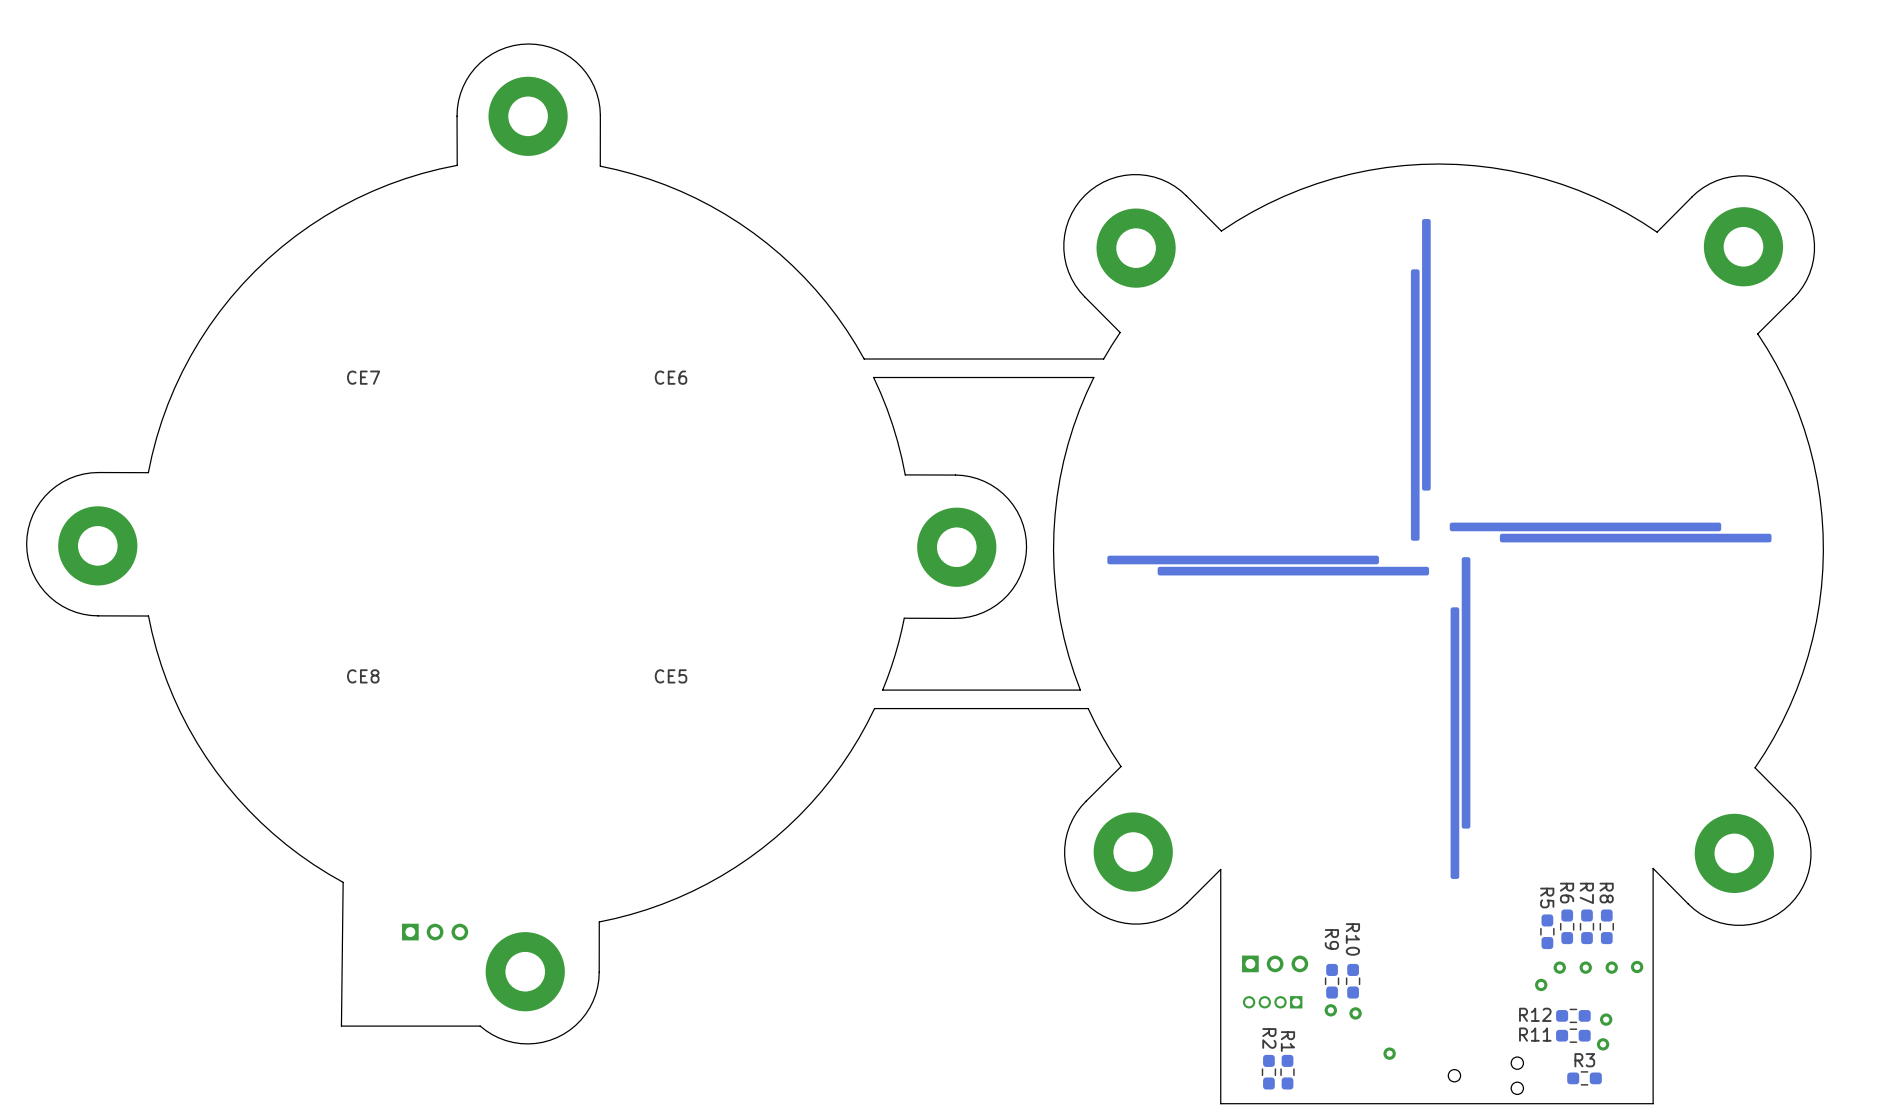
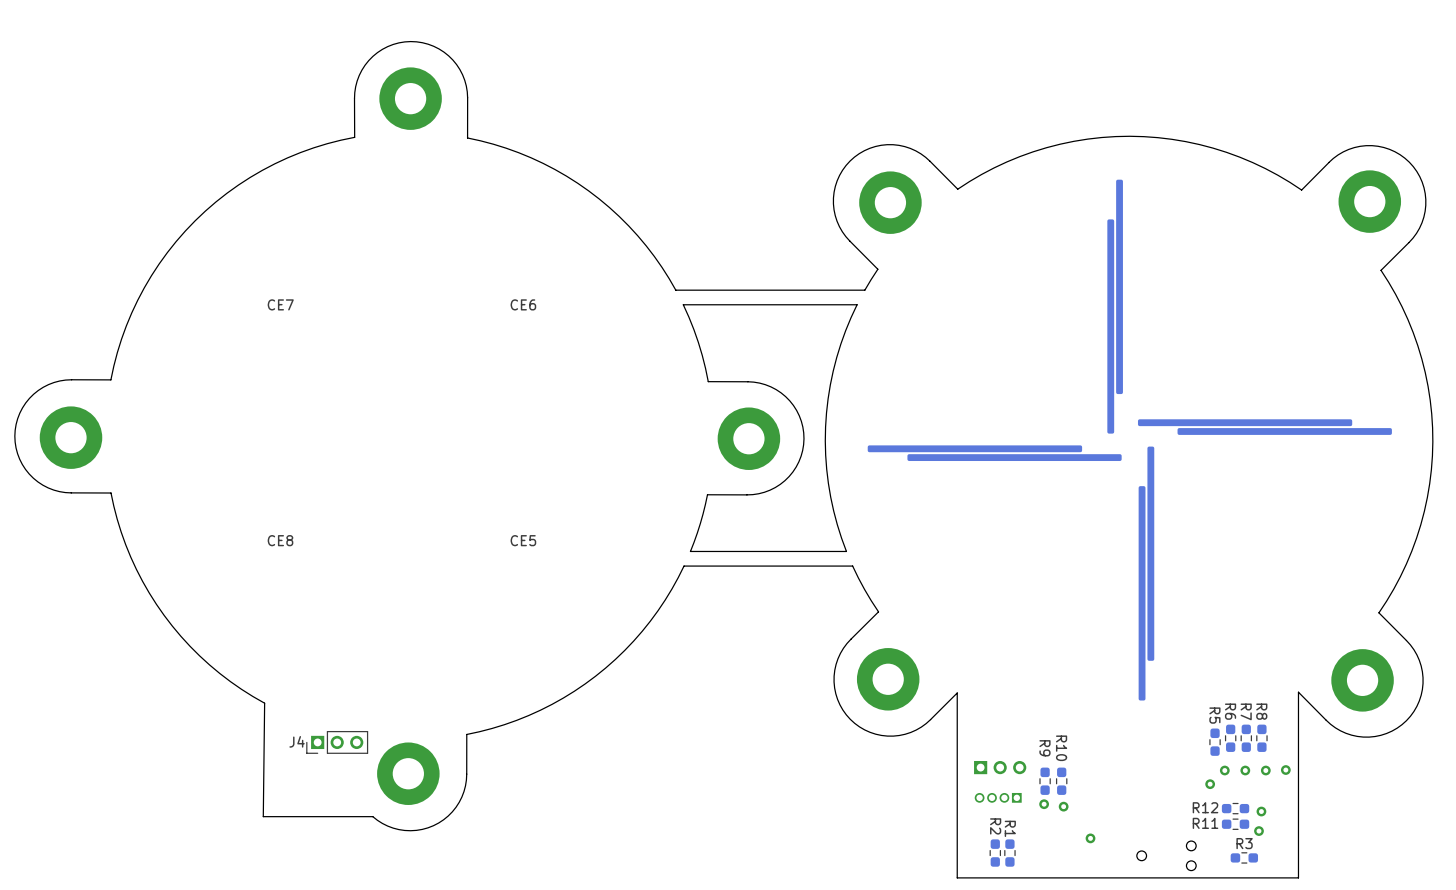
J4 side: top (435, 932) -> bottom (337, 742)

